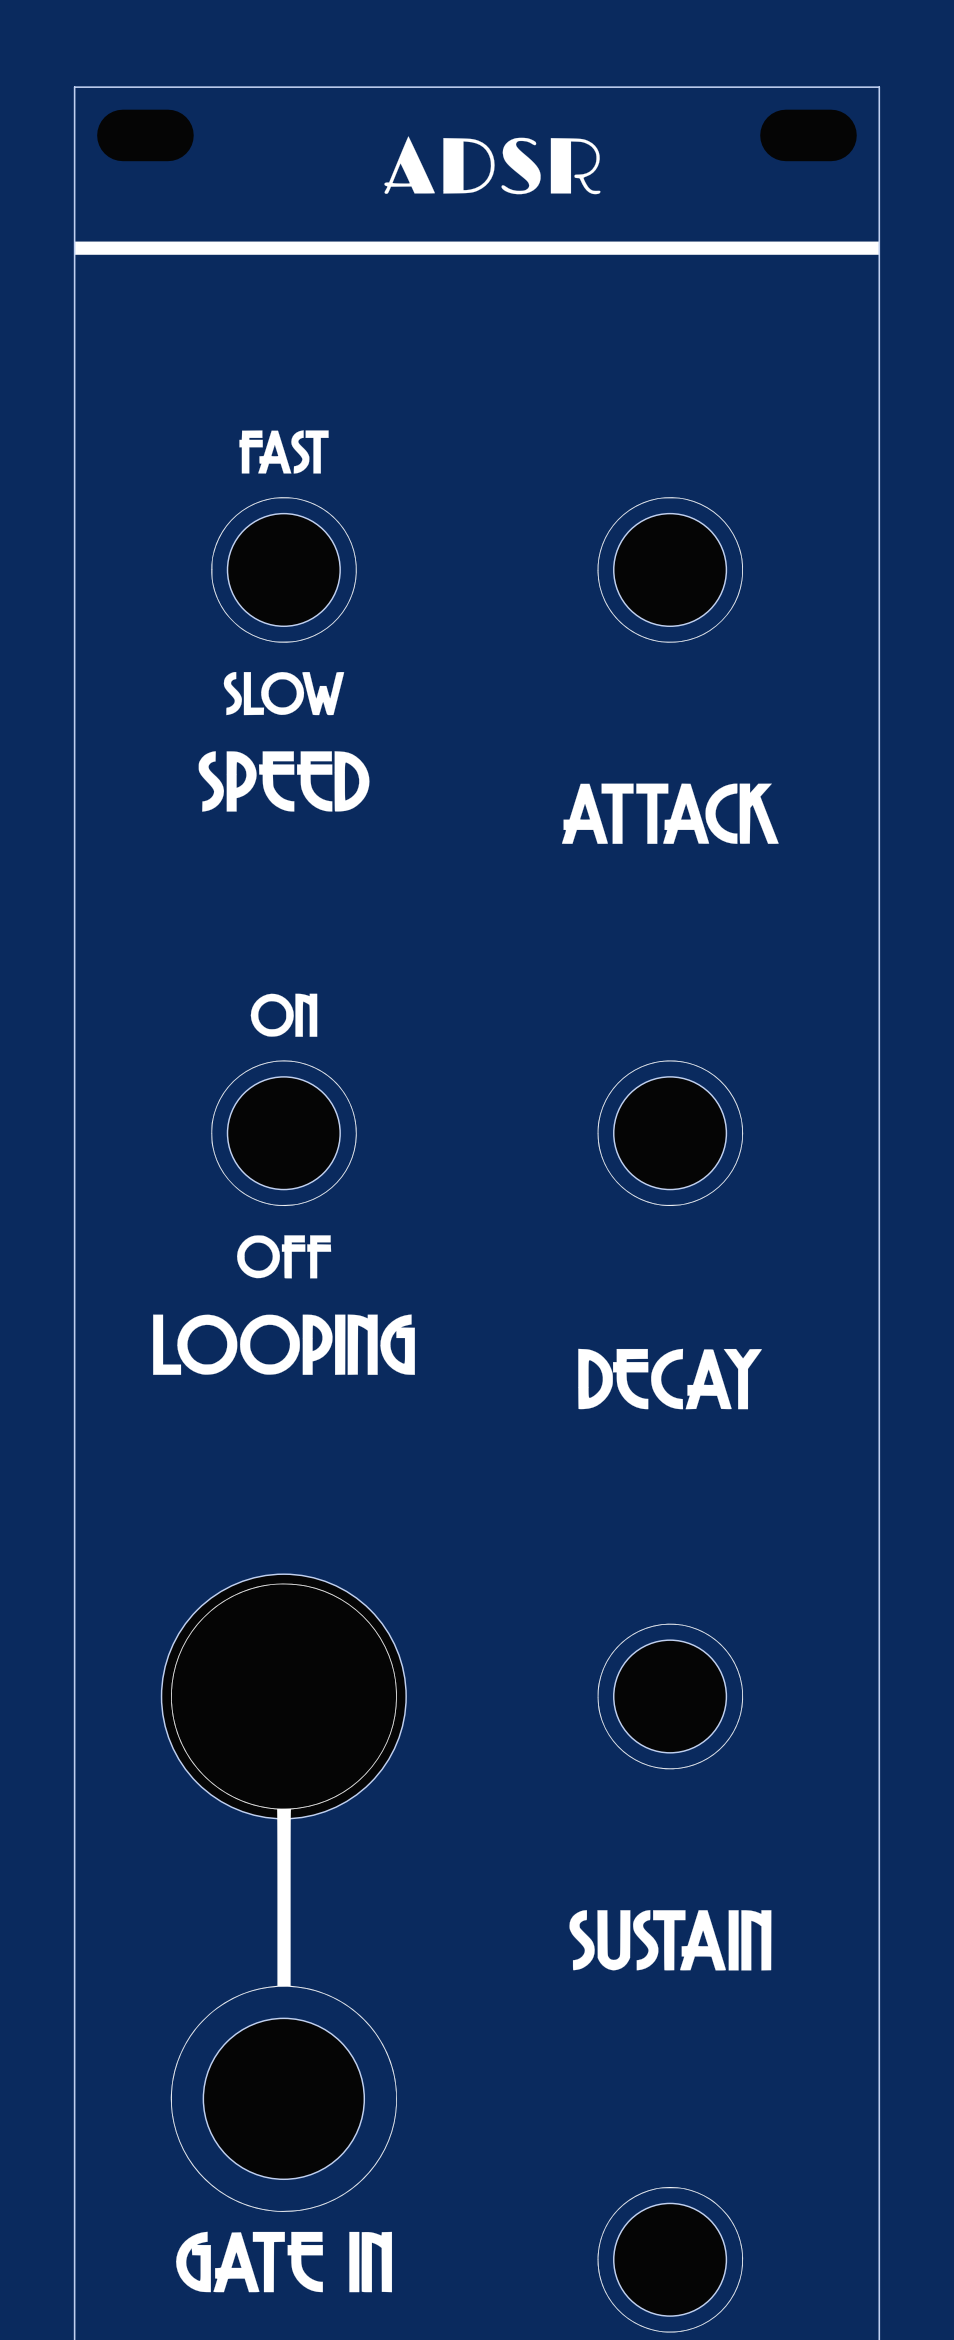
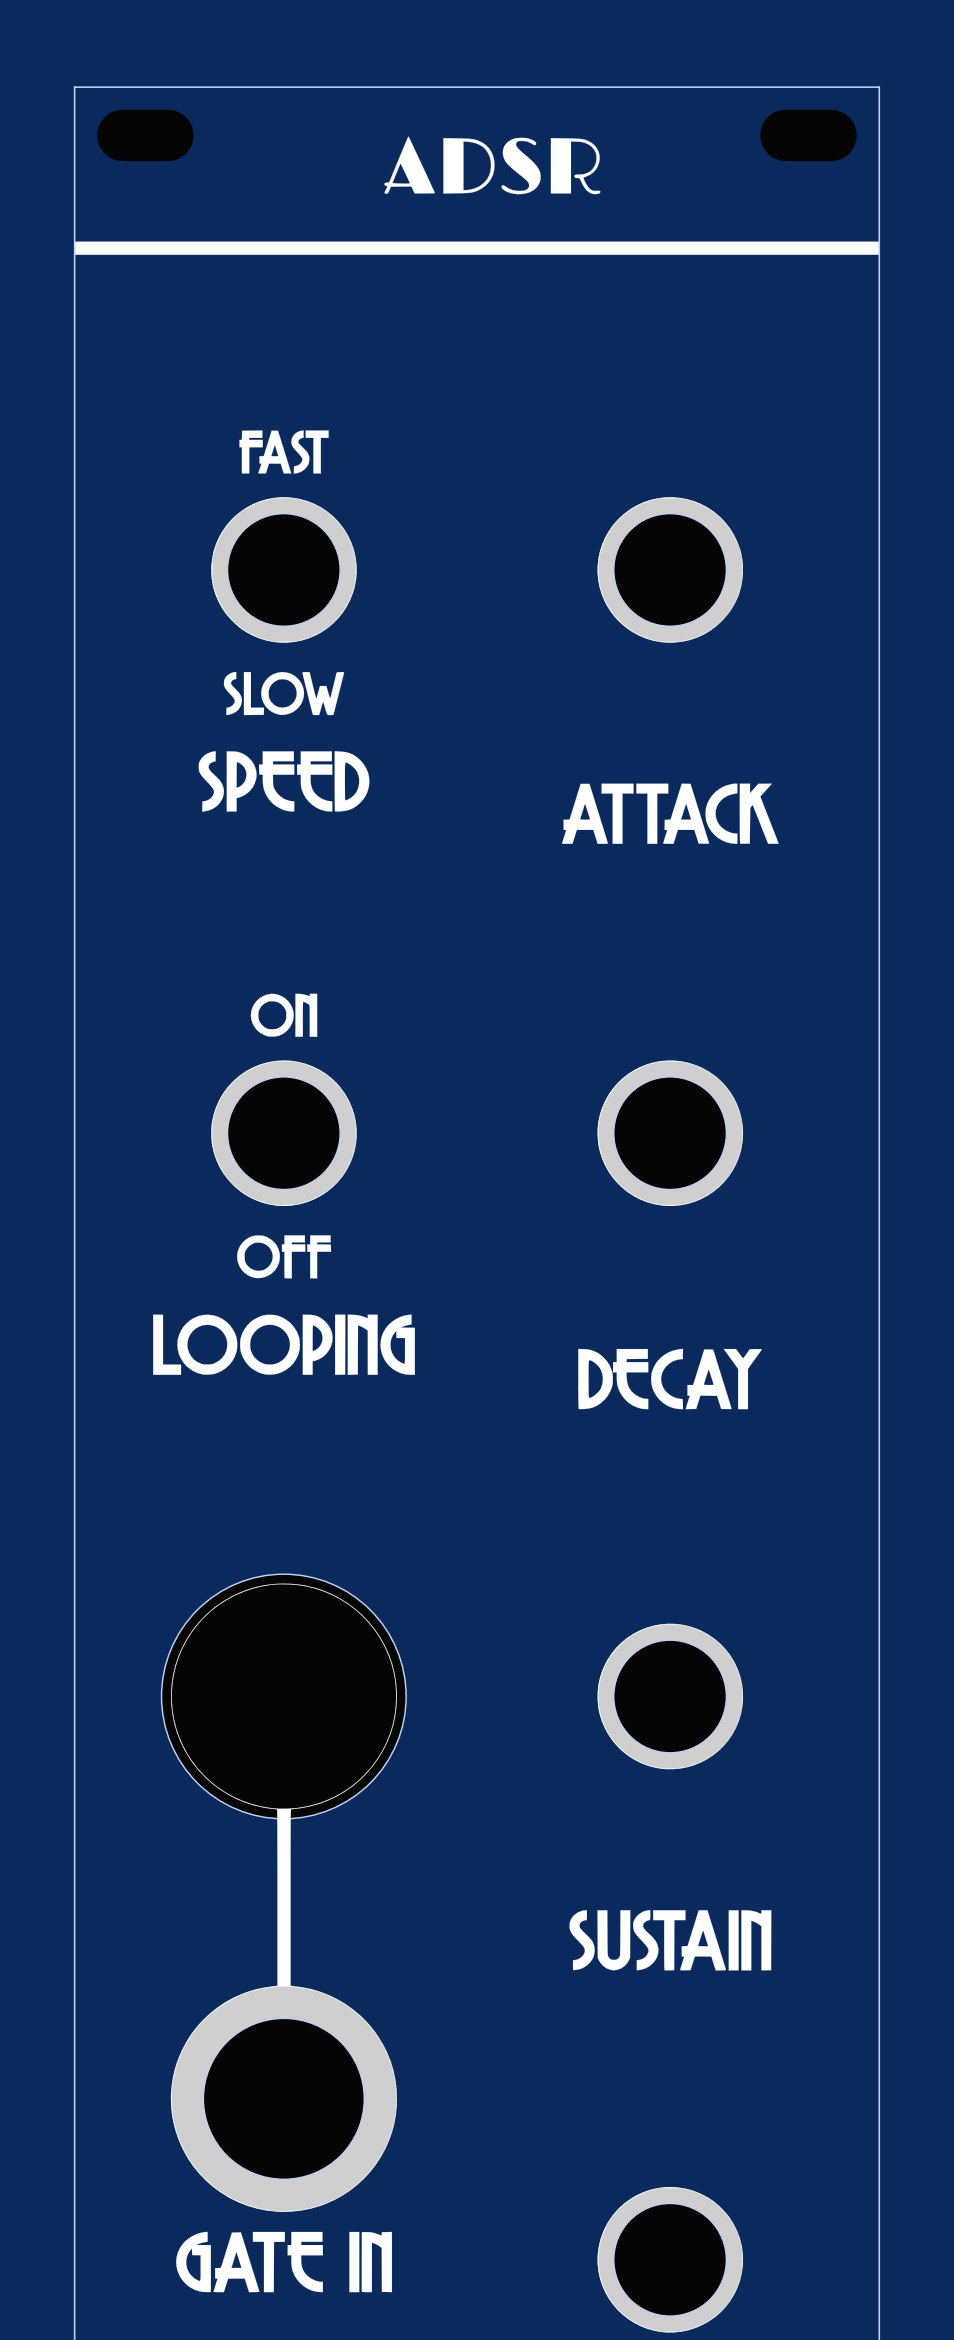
part footprint: [227, 513, 341, 627] -> [211, 497, 357, 643]
part footprint: [613, 513, 727, 627] -> [597, 497, 743, 643]
part footprint: [227, 1076, 341, 1190] -> [211, 1060, 357, 1206]
part footprint: [613, 1076, 727, 1190] -> [597, 1060, 743, 1206]
part footprint: [613, 1640, 727, 1753] -> [597, 1624, 743, 1769]
part footprint: [203, 2018, 365, 2180] -> [171, 1986, 397, 2212]
part footprint: [613, 2203, 727, 2317] -> [597, 2187, 743, 2333]

